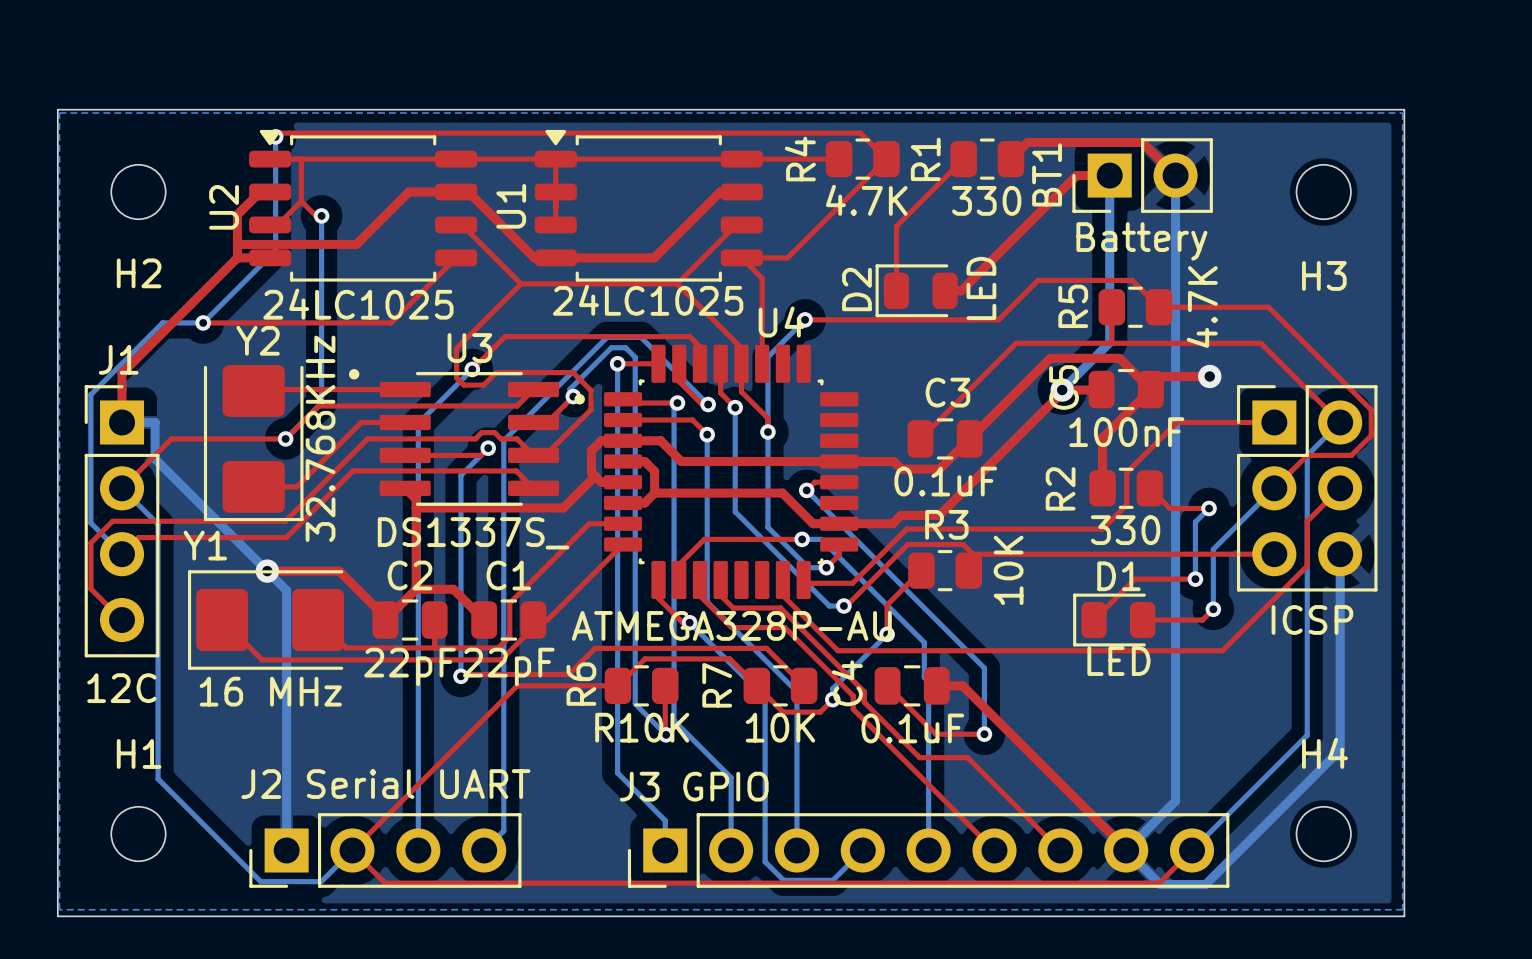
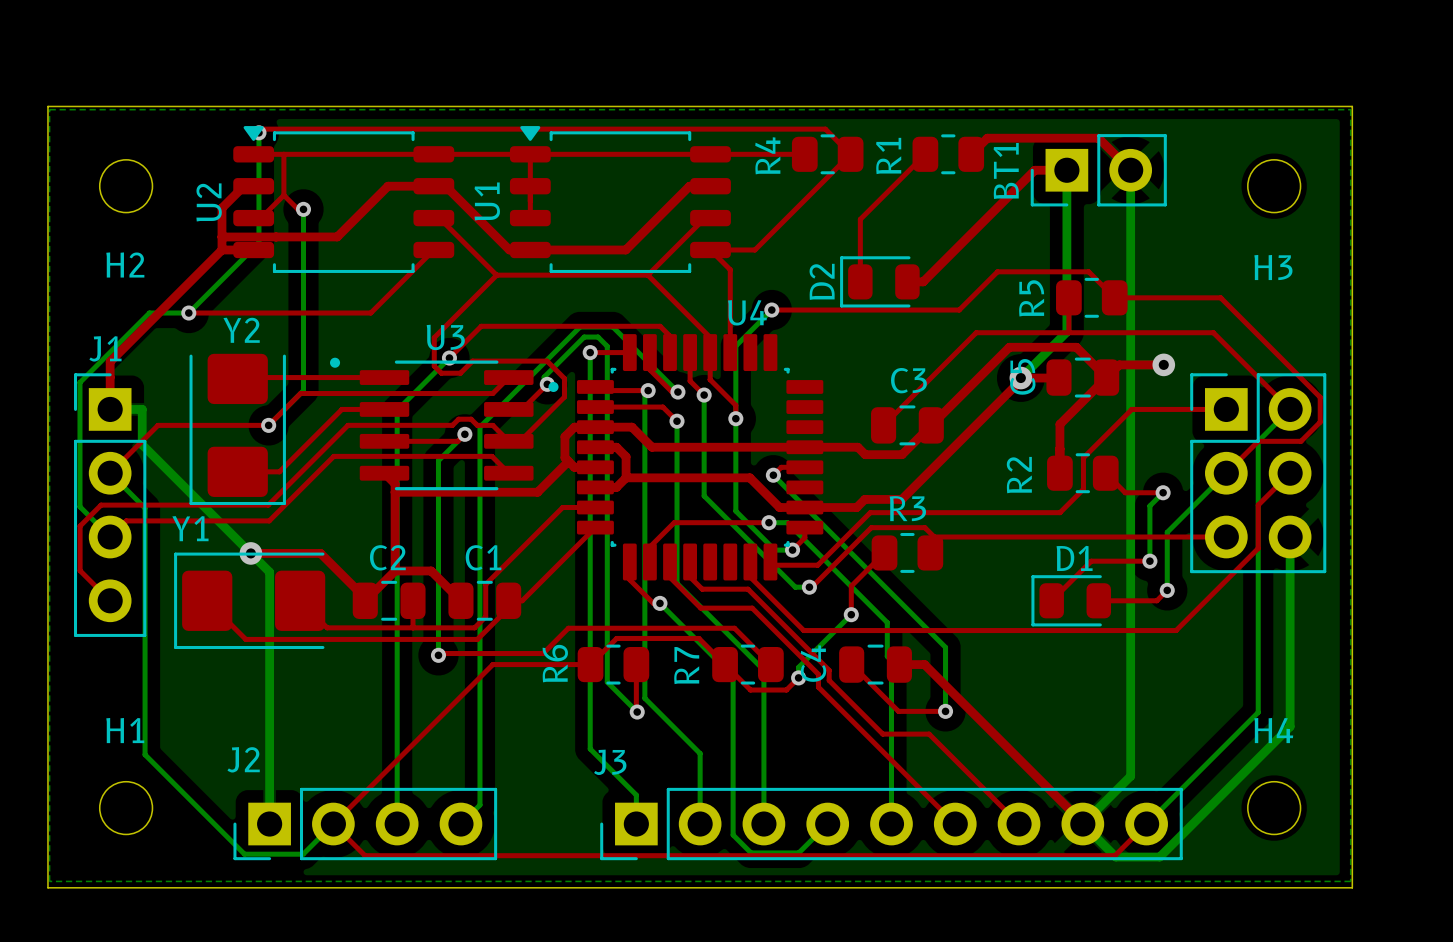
R4 value: 4.7K (866, 200) -> none
R1 value: 330 (986, 200) -> none
BT1 value: Battery (1141, 241) -> none
D2 value: LED (981, 288) -> none
U1 value: 24LC1025 (648, 300) -> none
U2 value: 24LC1025 (358, 304) -> none
R5 value: 4.7K (1202, 306) -> none
C5 value: 100nF (1126, 432) -> none
Y2 value: 32.768KHz (320, 438) -> none
C3 value: 0.1uF (945, 481) -> none
R2 value: 330 (1125, 530) -> none
U3 value: DS1337S_ (473, 533) -> none
R3 value: 10K (1008, 570) -> none
part text: ICSP (1312, 619) -> none
U4 value: ATMEGA328P-AU (731, 625) -> none
D1 value: LED (1118, 661) -> none
C2 value: 22pF (410, 666) -> none
C1 value: 22pF (508, 666) -> none
J1 text: 12C (121, 688) -> none
Y1 value: 16 MHz (270, 691) -> none
R6 value: R10K (642, 727) -> none
R7 value: 10K (780, 727) -> none
C4 value: 0.1uF (912, 728) -> none
J2 text: Serial UART (418, 784) -> none
J3 text: GPIO (725, 786) -> none

